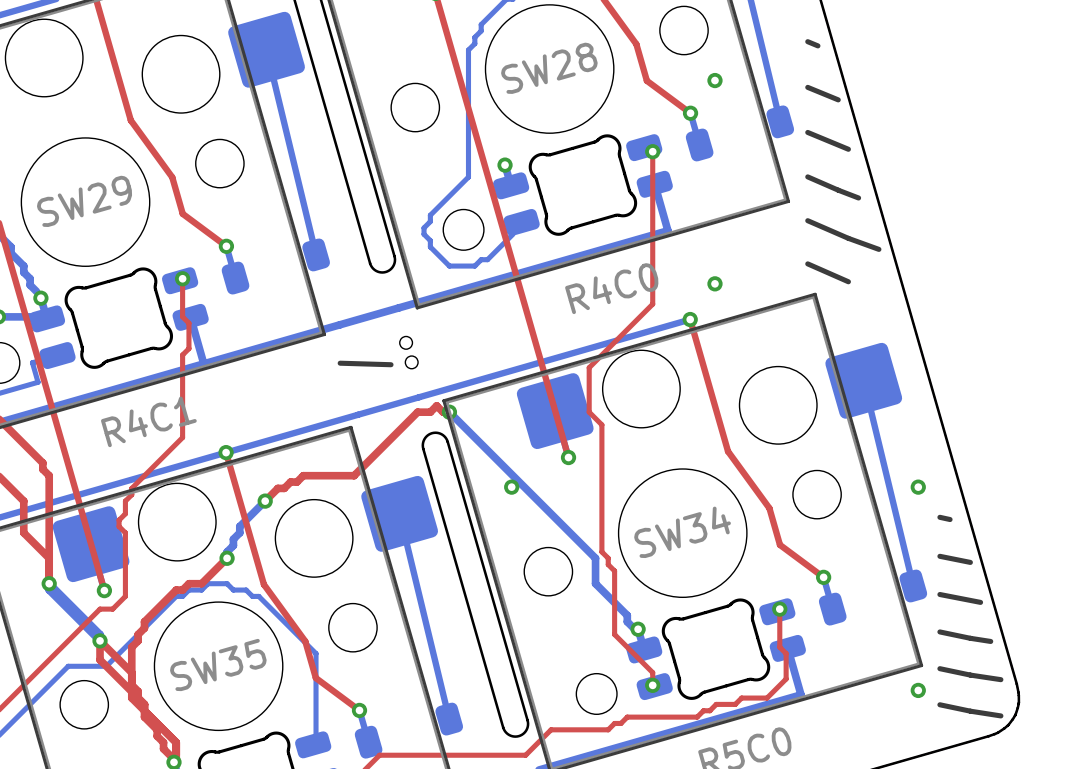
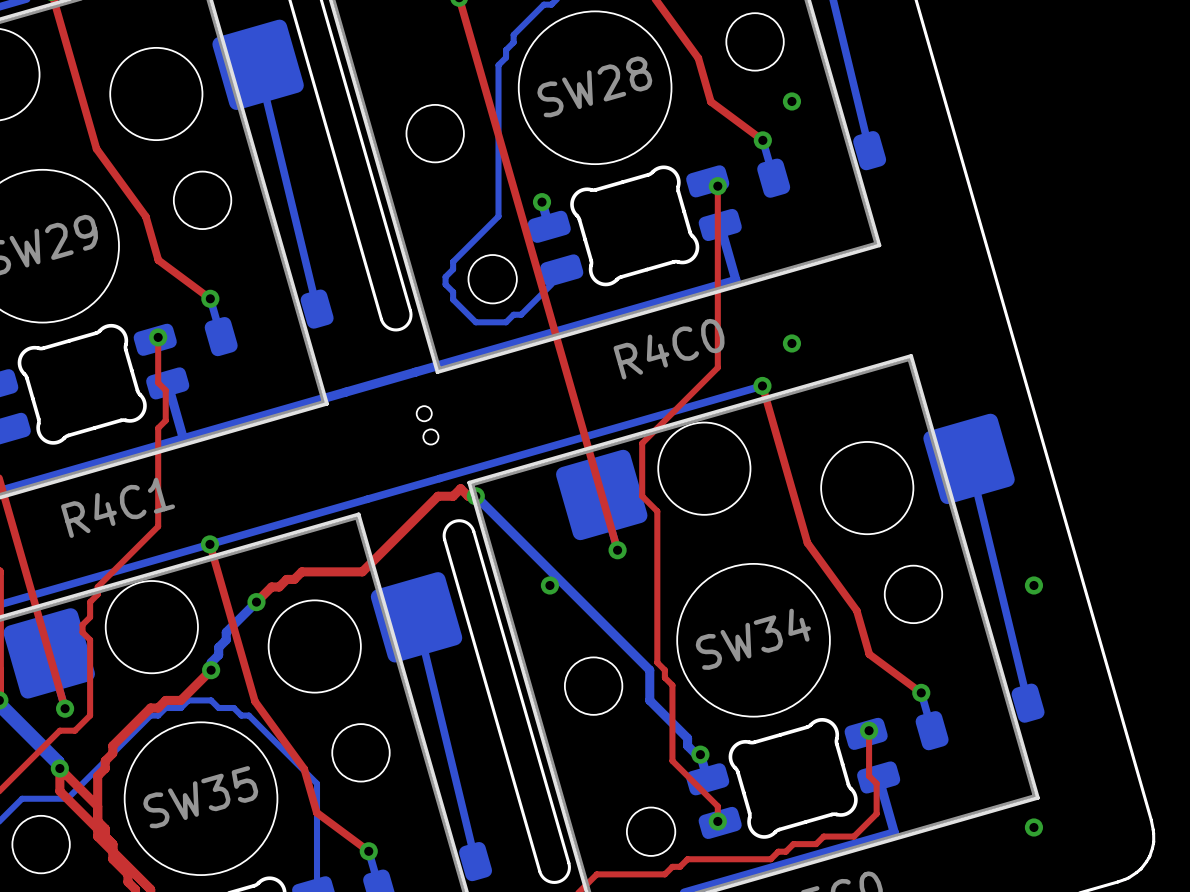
line: (807, 41) (817, 45) -> none
line: (807, 87) (838, 99) -> none
line: (807, 132) (848, 149) -> none
line: (807, 176) (858, 197) -> none
line: (807, 220) (878, 249) -> none
line: (807, 263) (848, 281) -> none
line: (340, 363) (391, 364) -> none
line: (939, 517) (950, 519) -> none
line: (939, 556) (970, 562) -> none
line: (939, 594) (980, 602) -> none
line: (939, 631) (990, 641) -> none
line: (939, 668) (1000, 679) -> none
line: (939, 704) (1000, 715) -> none

